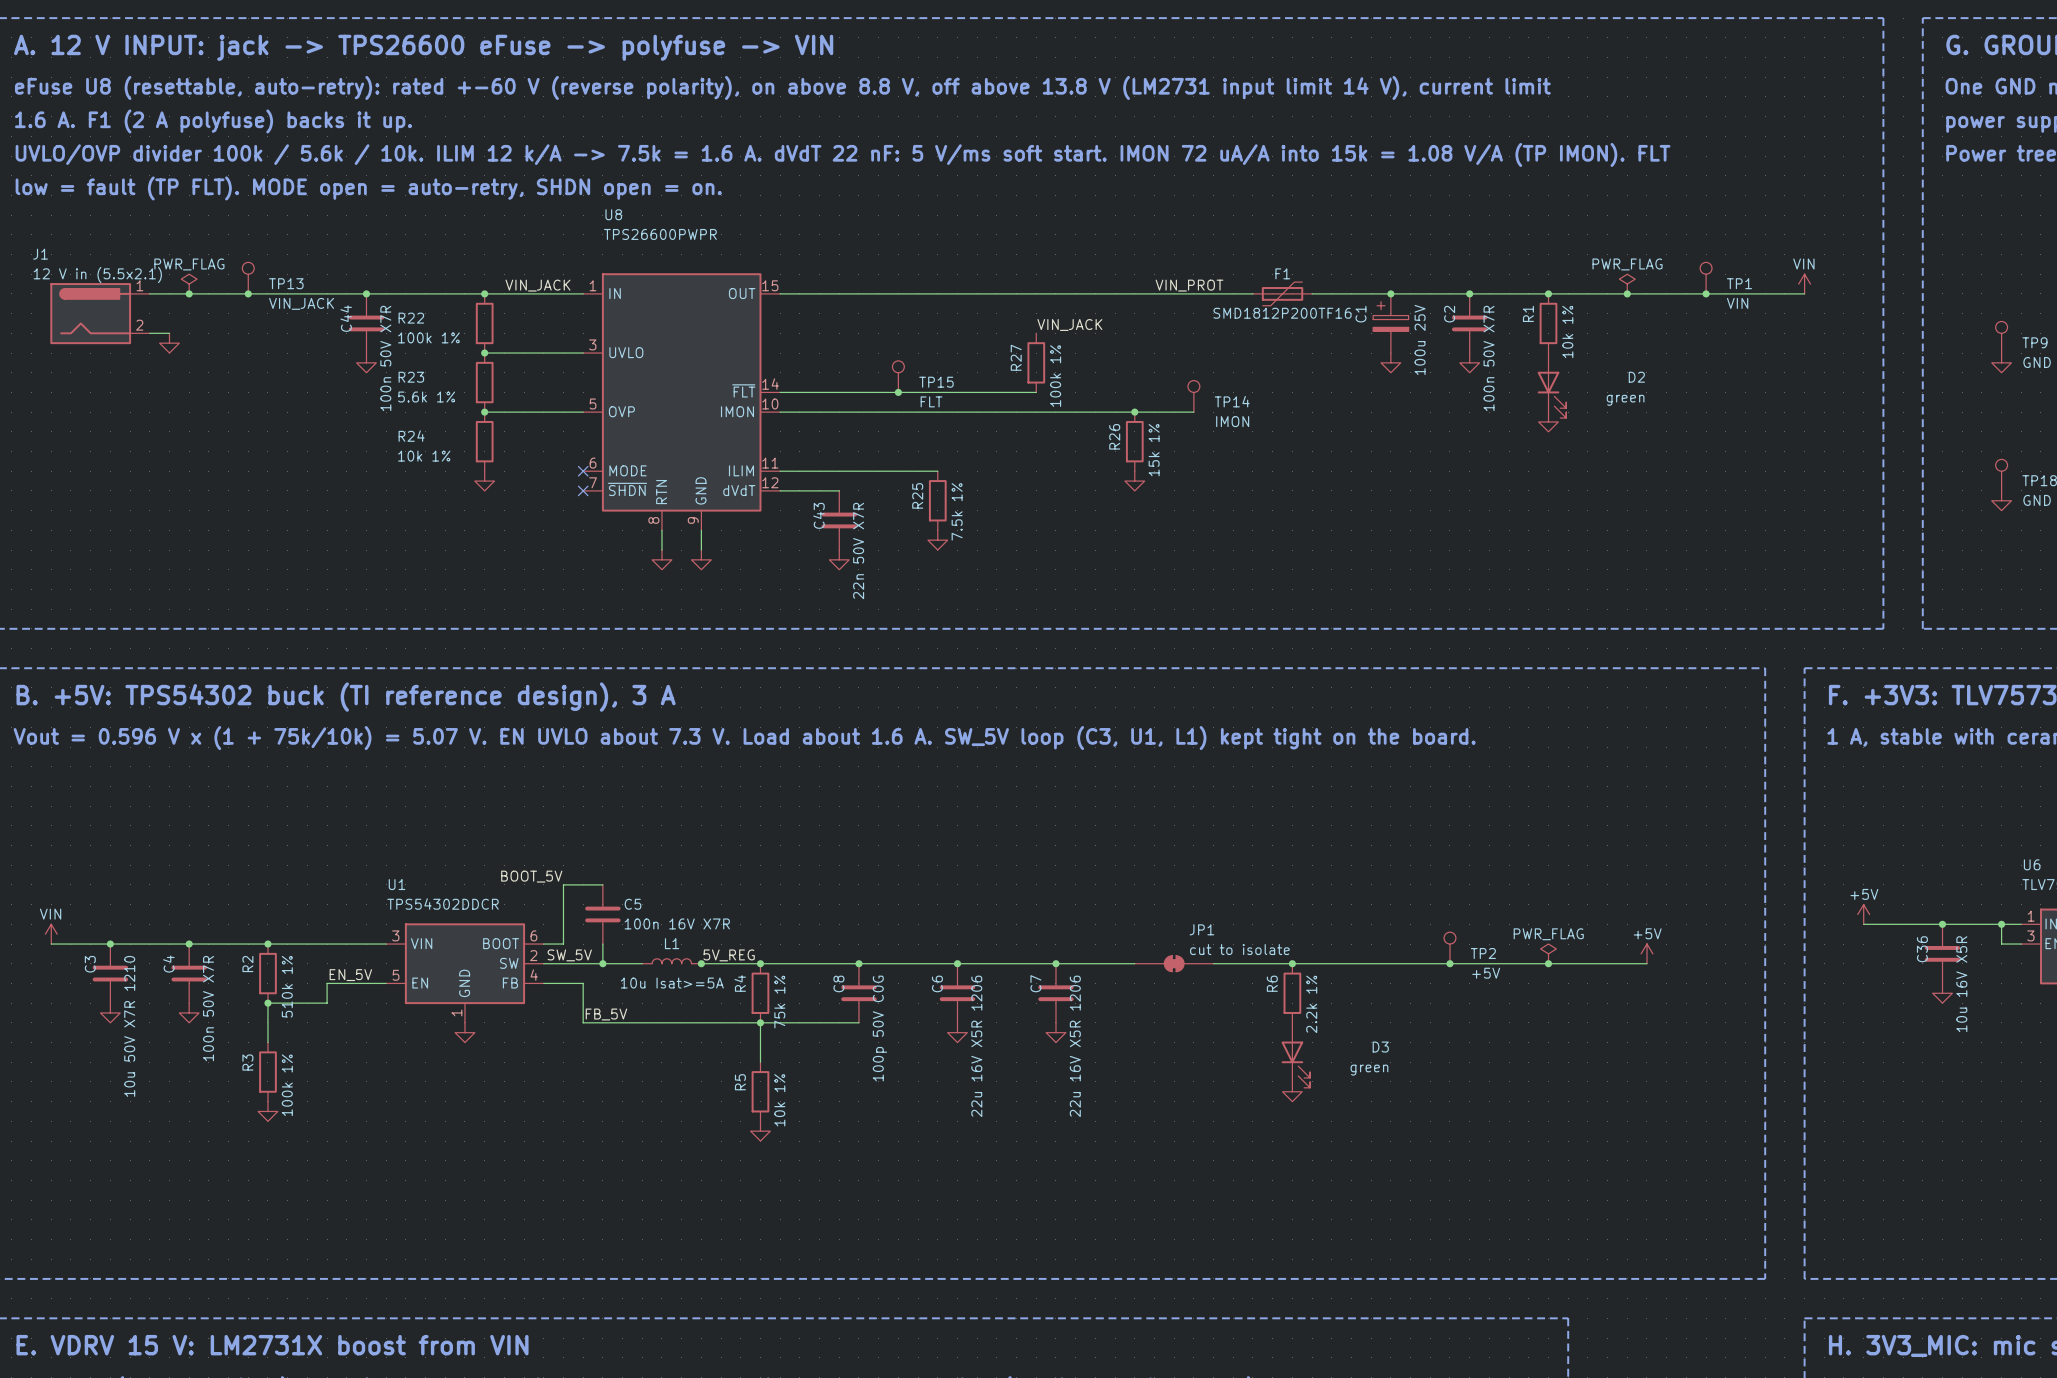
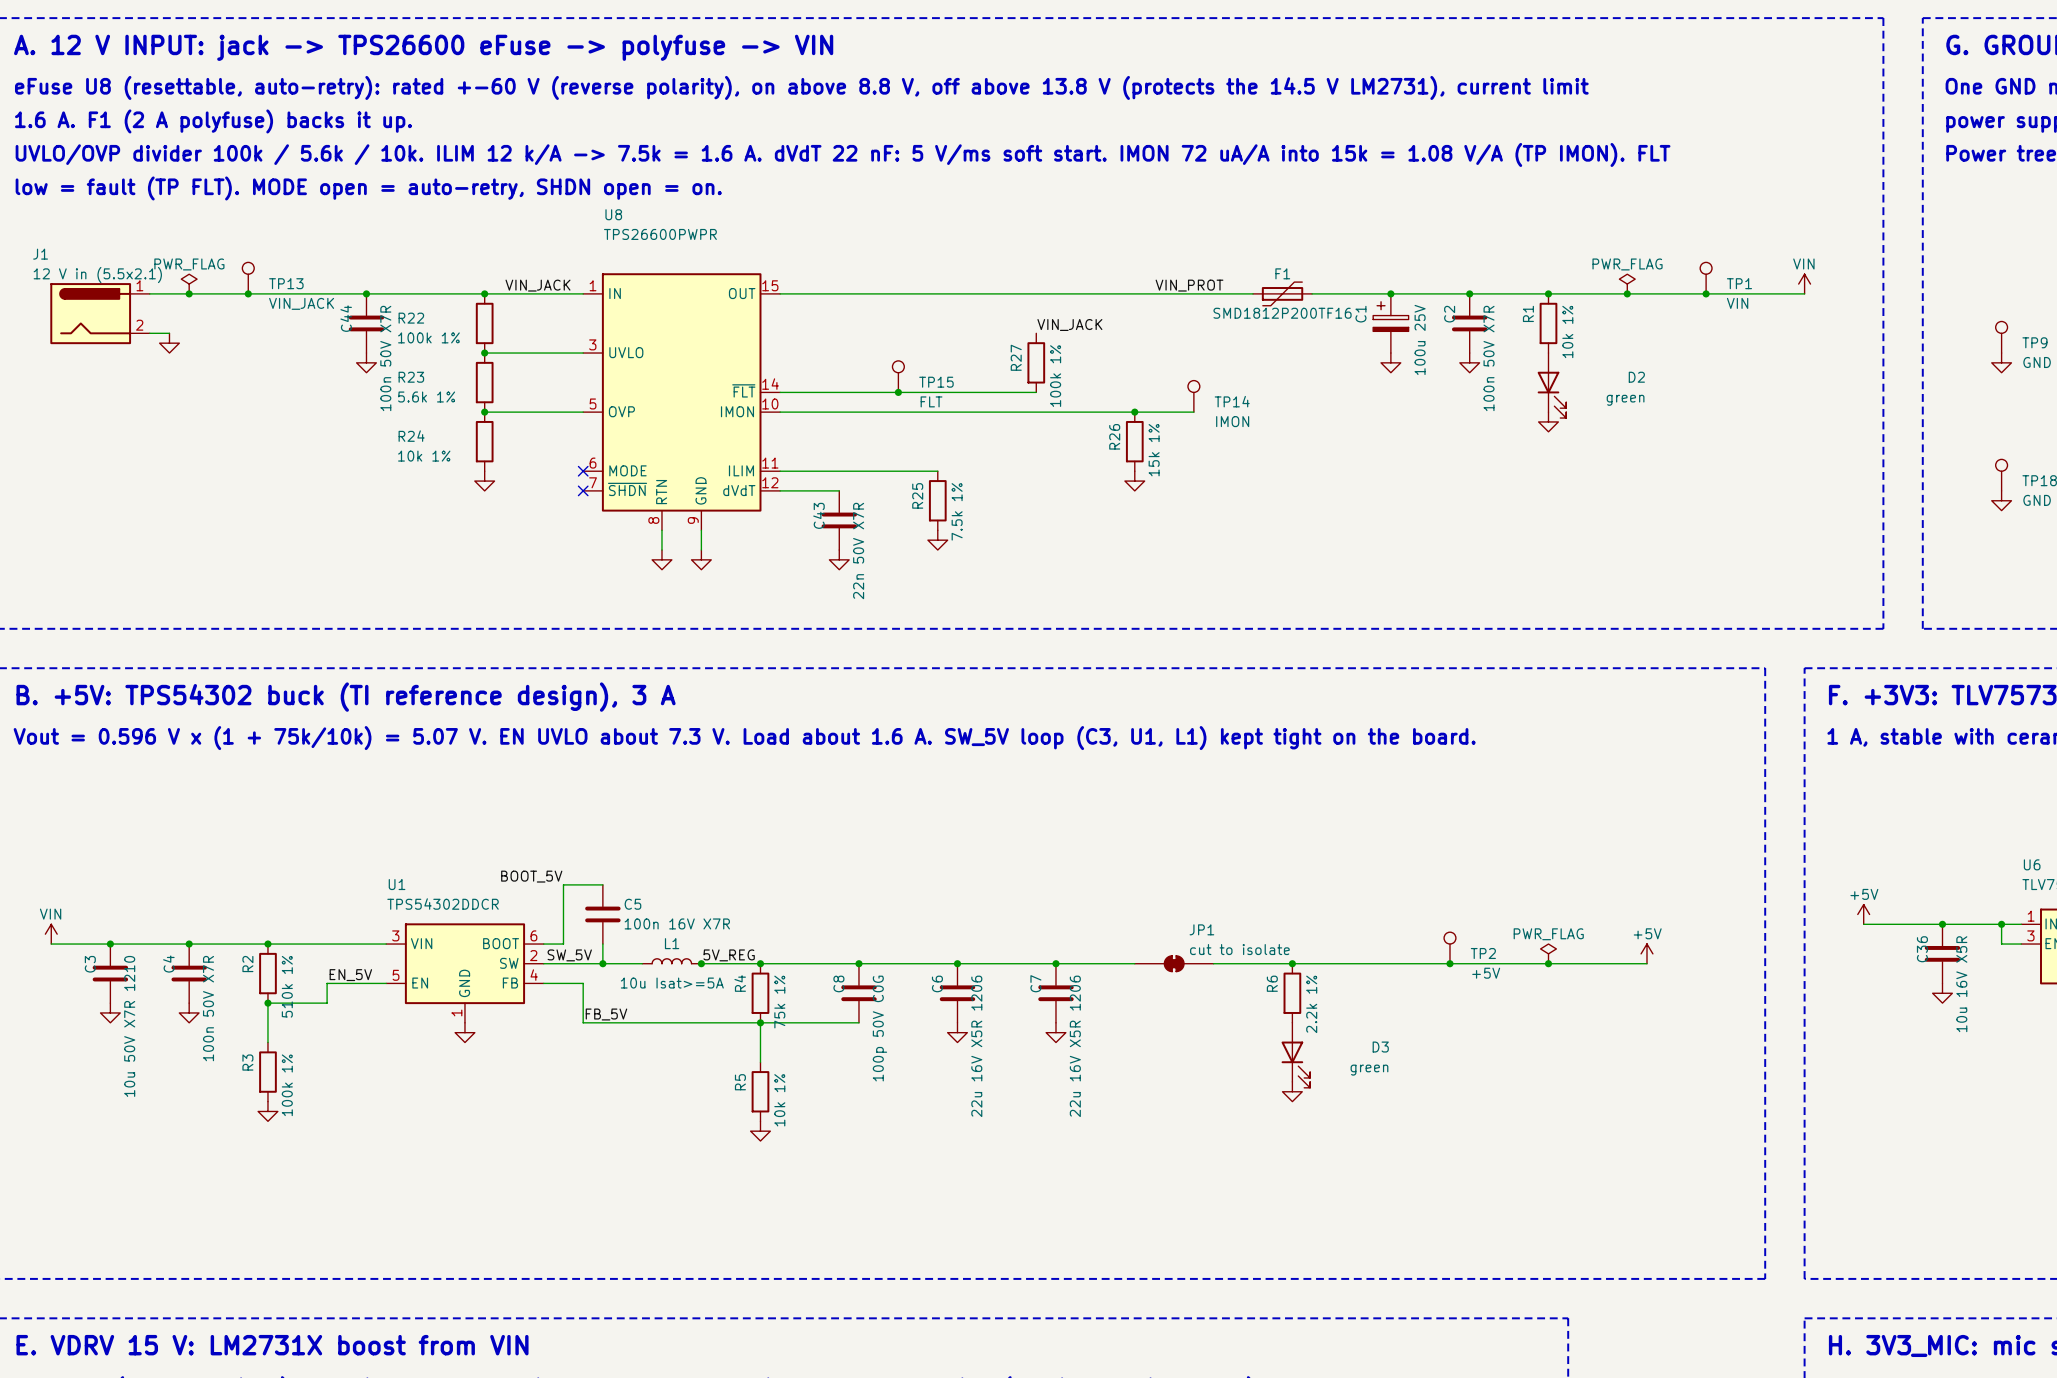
text: eFuse U8 (resettable, auto-retry): rated +-60 V (reverse polarity), on above 8.8 V, off above 13.8 V (LM2731 input limit 14 V), current limit (782, 87) -> eFuse U8 (resettable, auto-retry): rated +-60 V (reverse polarity), on above 8.8 V, off above 13.8 V (protects the 14.5 V LM2731), current limit (801, 87)

